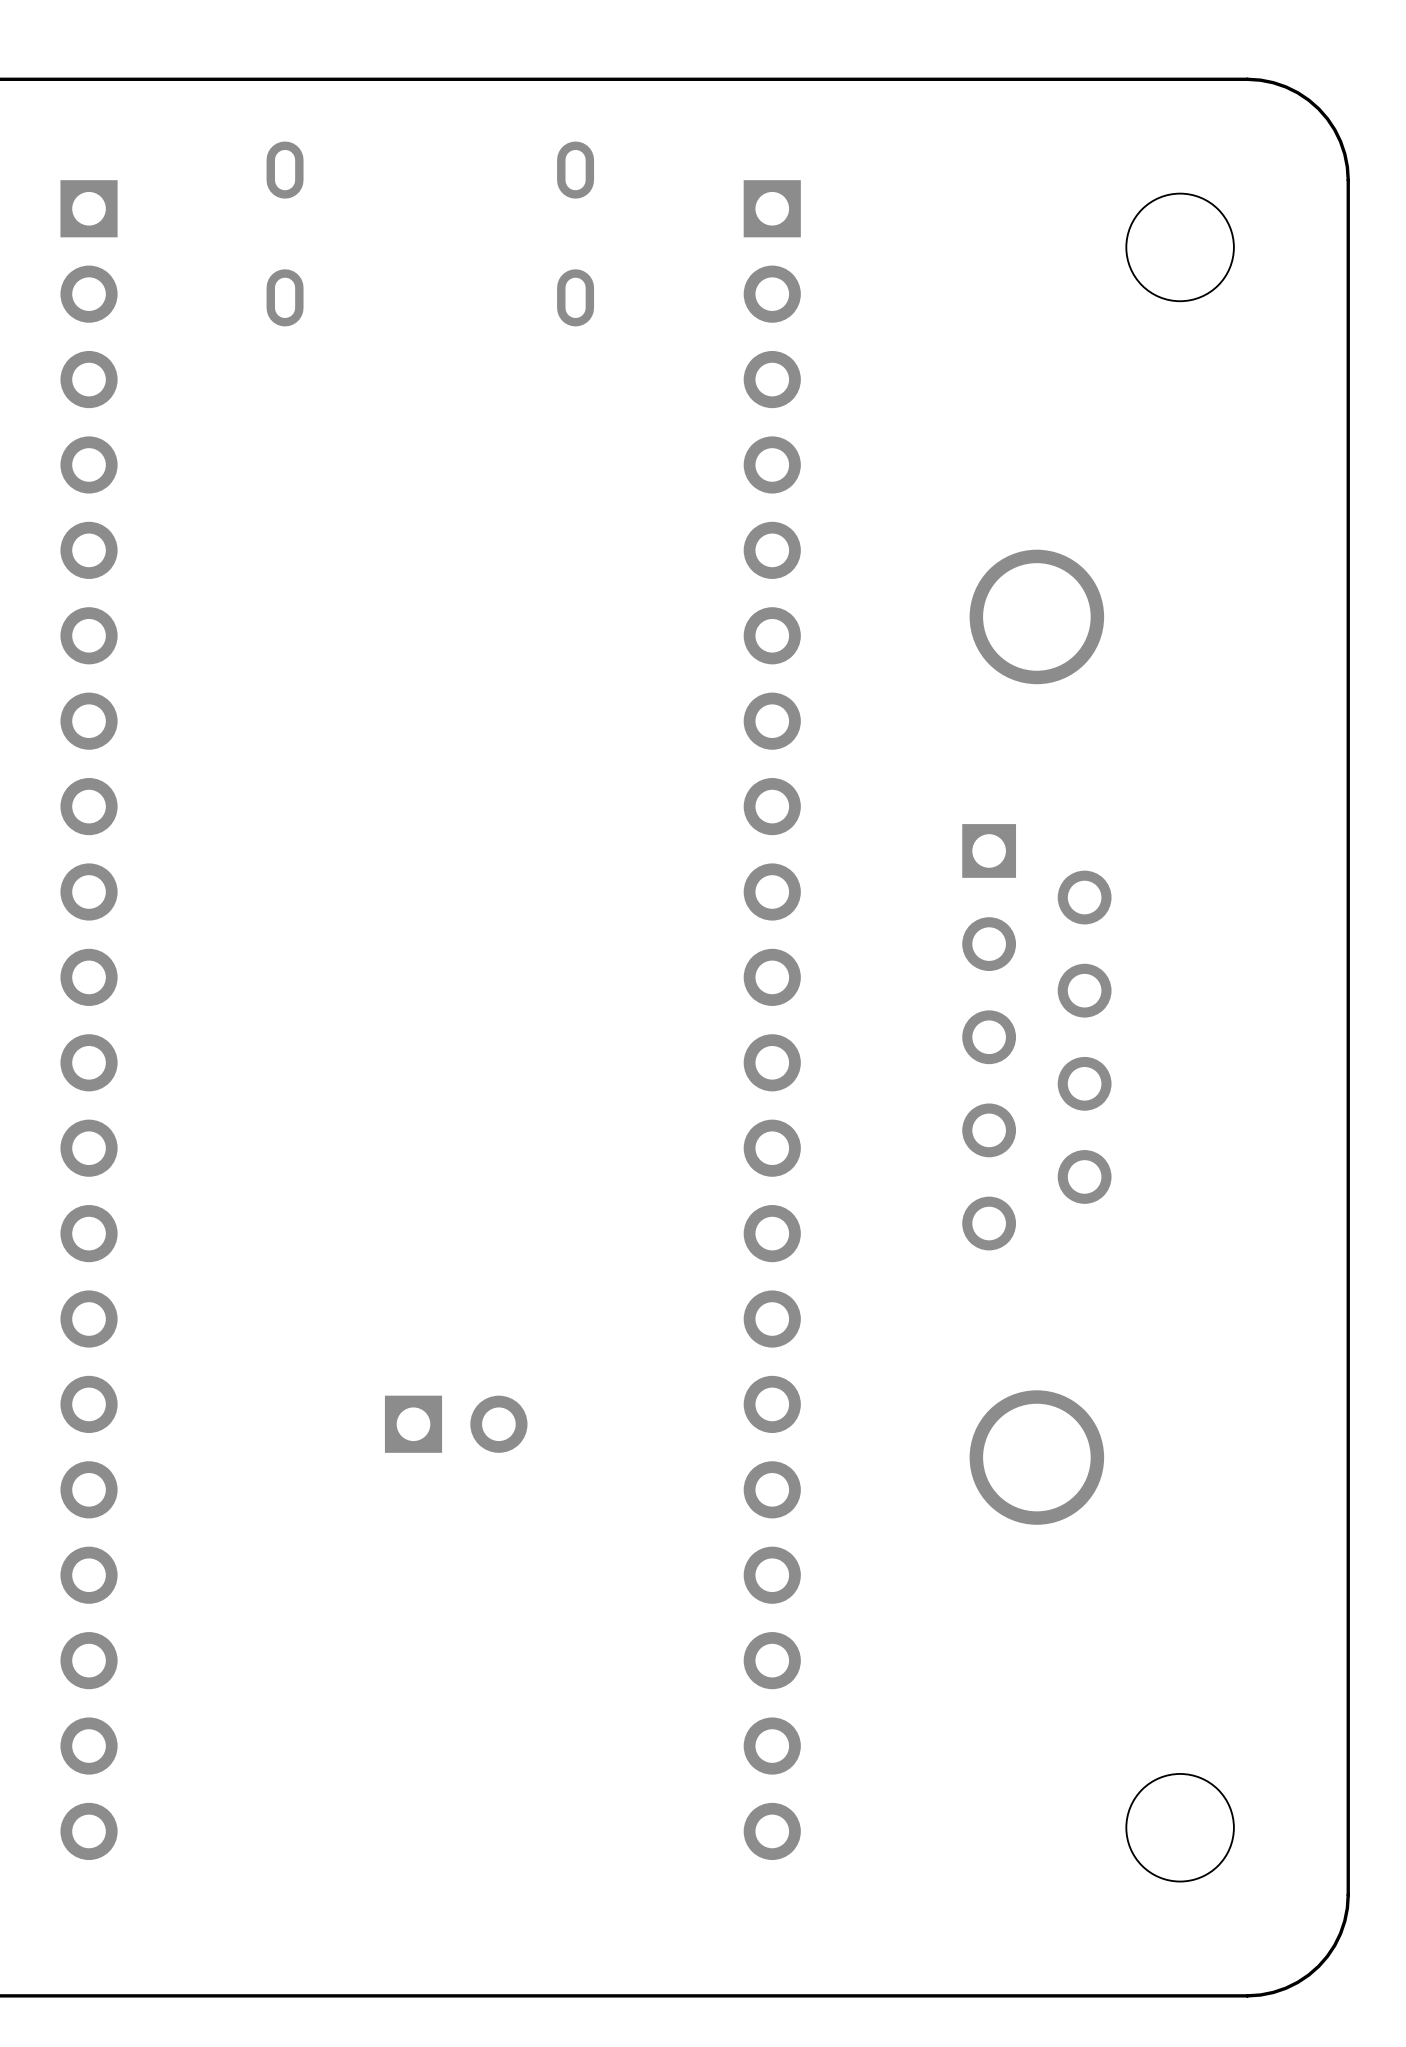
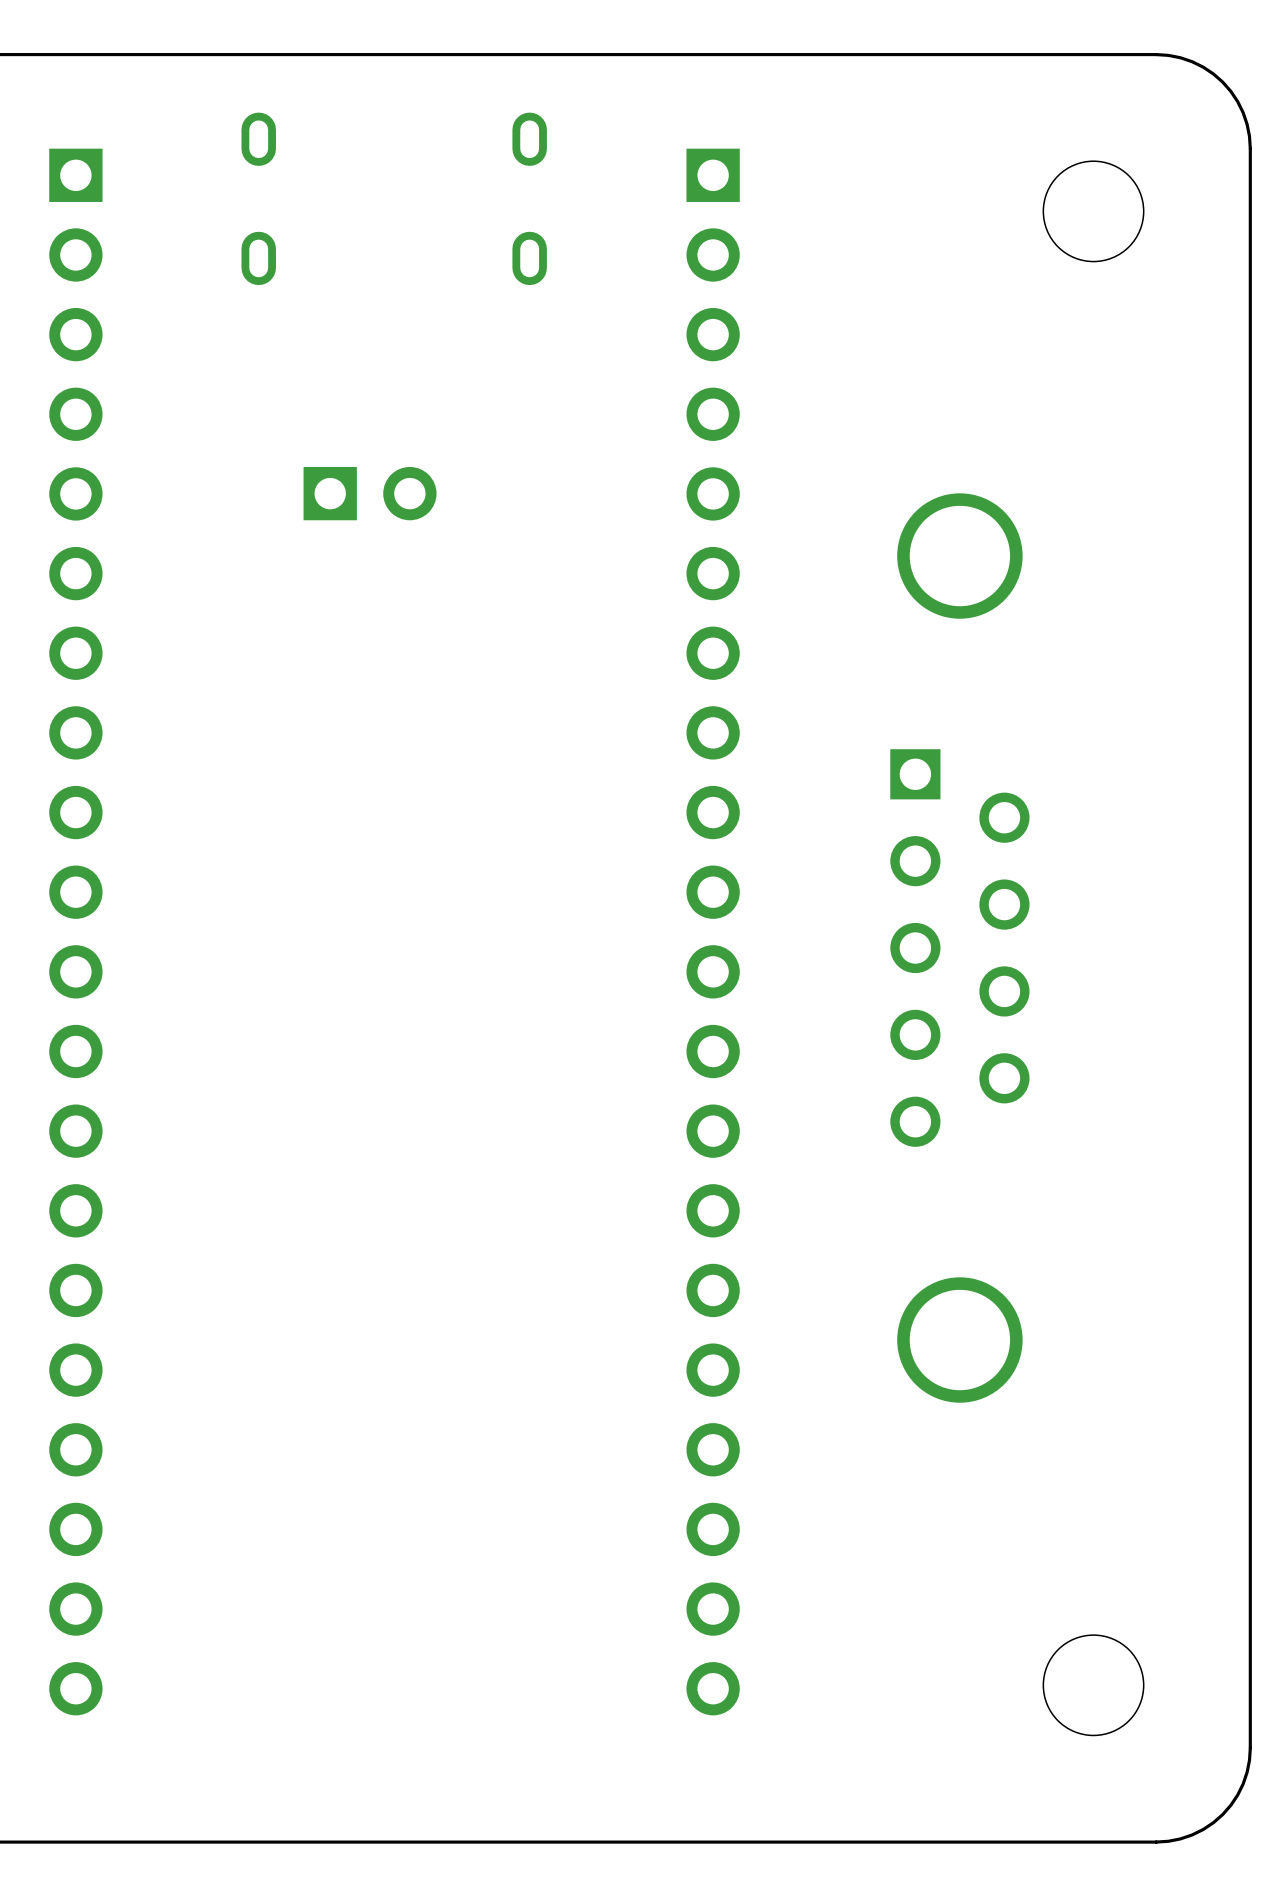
part: none -> (370, 493)
part: (456, 1424) -> none

